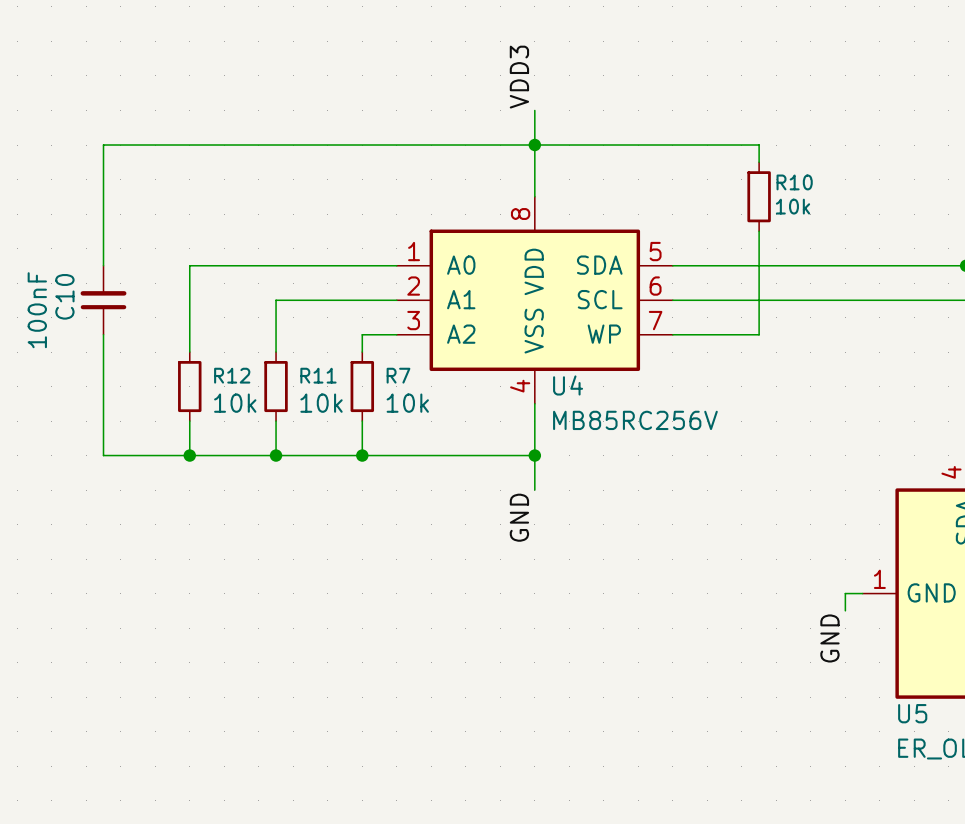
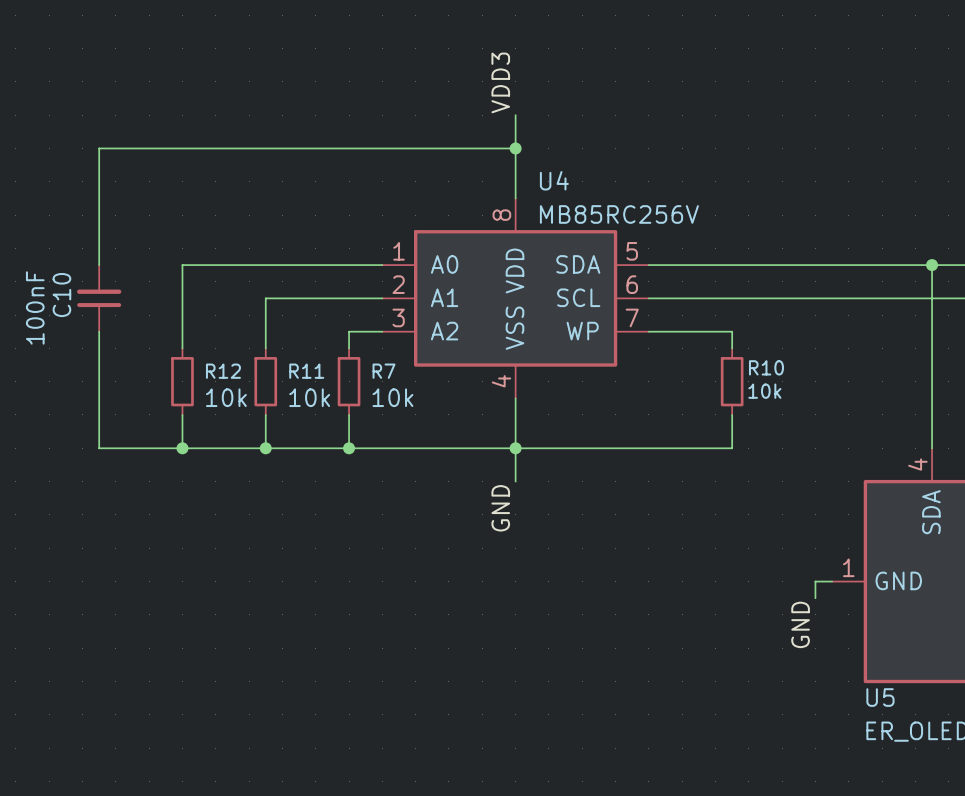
wire: (534, 145) (759, 145) (759, 162) -> none
R10 position: (759, 196) -> (732, 381)
wire: (759, 231) (759, 334) -> (732, 348) (732, 331)
U4 name position: U4 (568, 385) -> U4 (554, 180)
U4 value position: MB85RC256V (635, 420) -> MB85RC256V (619, 214)
wire: none -> (732, 414) (732, 448) (515, 448)

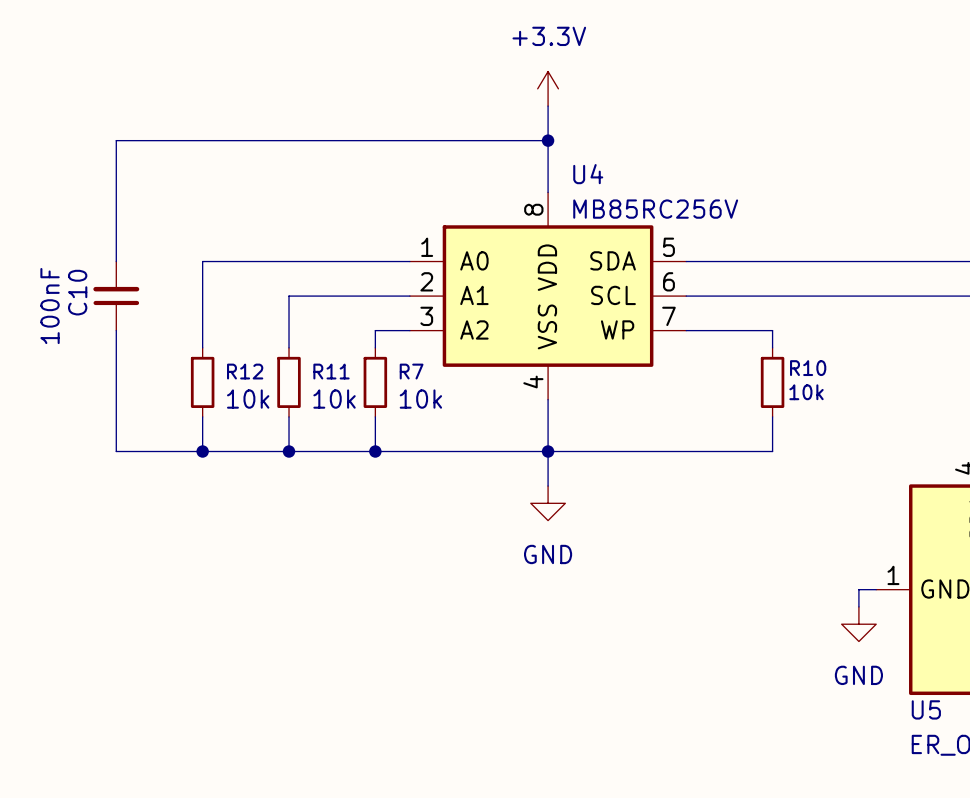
label: VDD3 (500, 82) -> none
power symbol: none -> +3.3V (548, 88)
power symbol: none -> GND (548, 503)
label: GND (500, 508) -> none
power symbol: none -> GND (858, 624)
label: GND (800, 624) -> none

